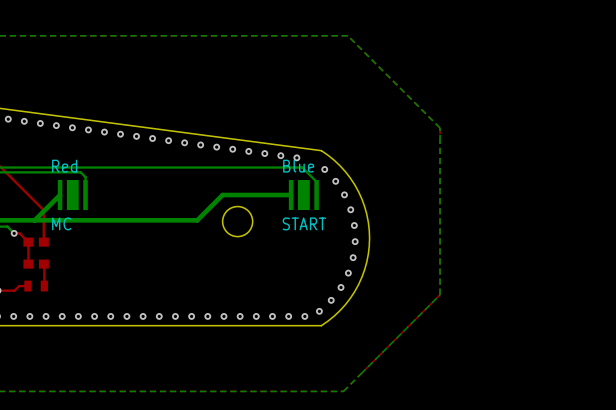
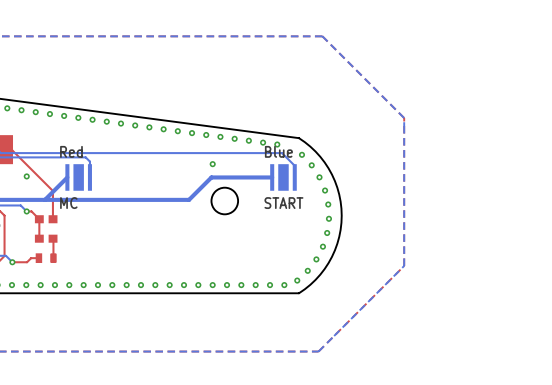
via: none -> (212, 164)
via: none -> (26, 176)

